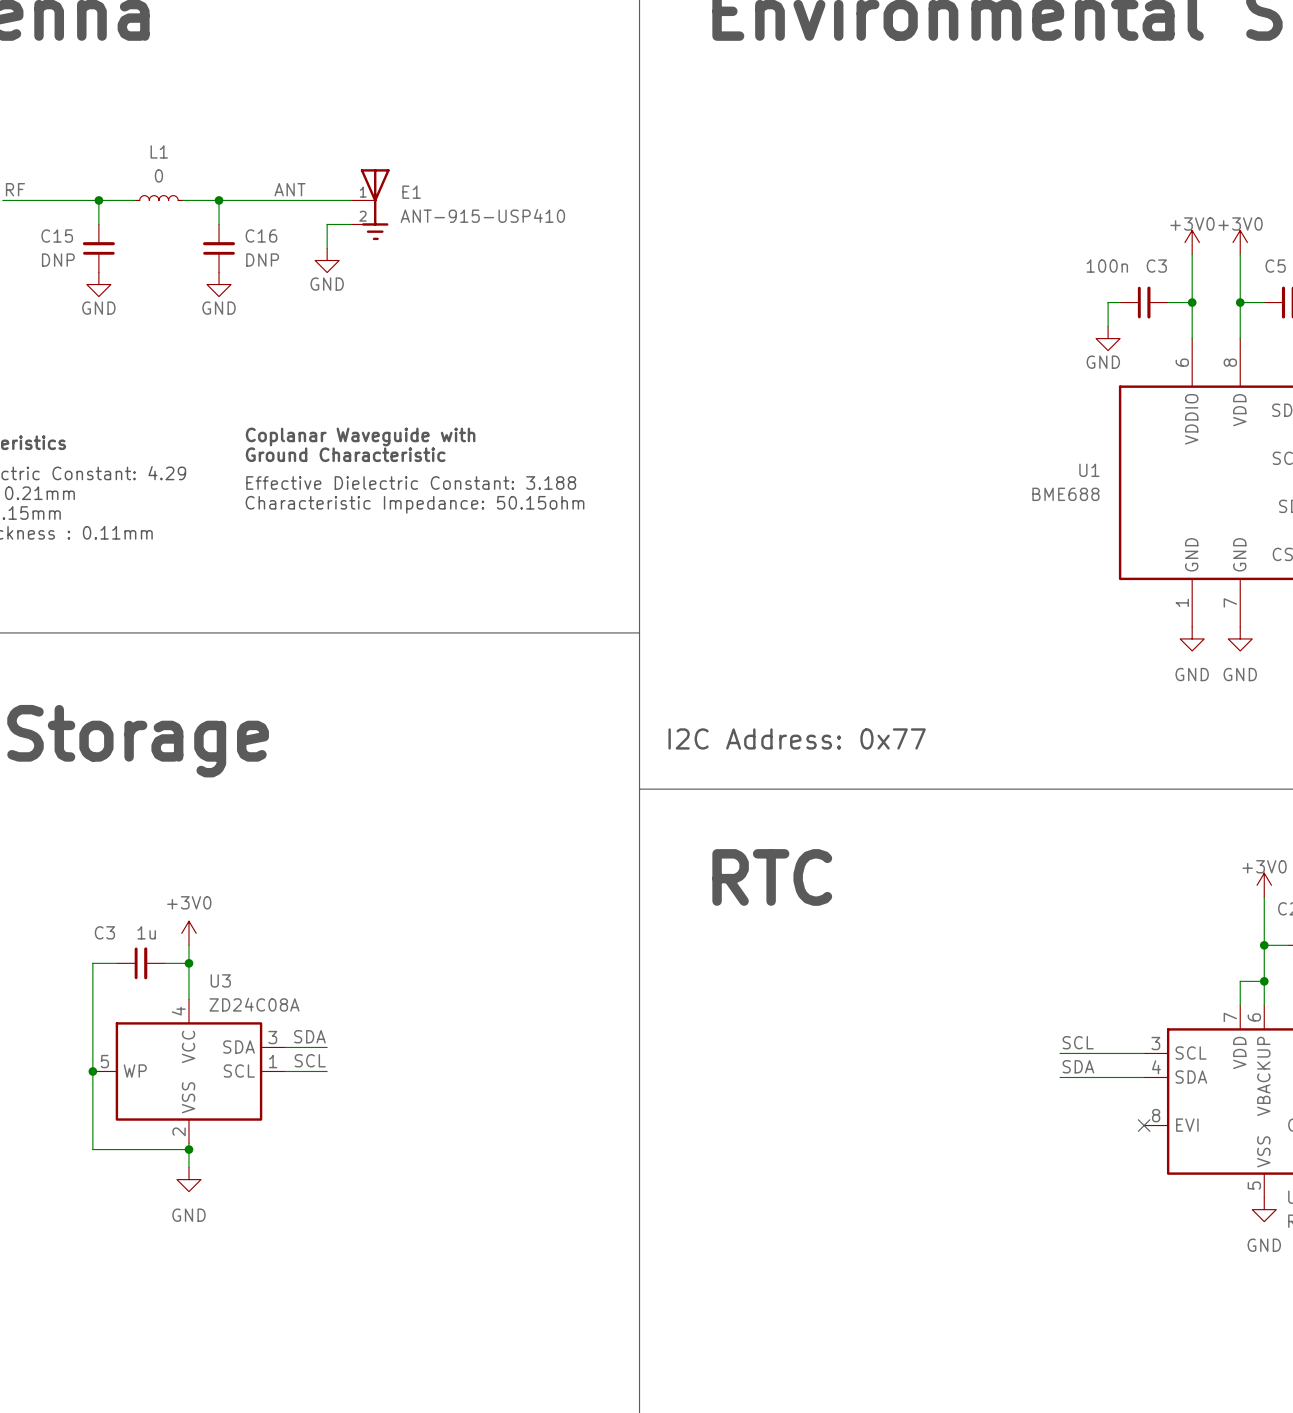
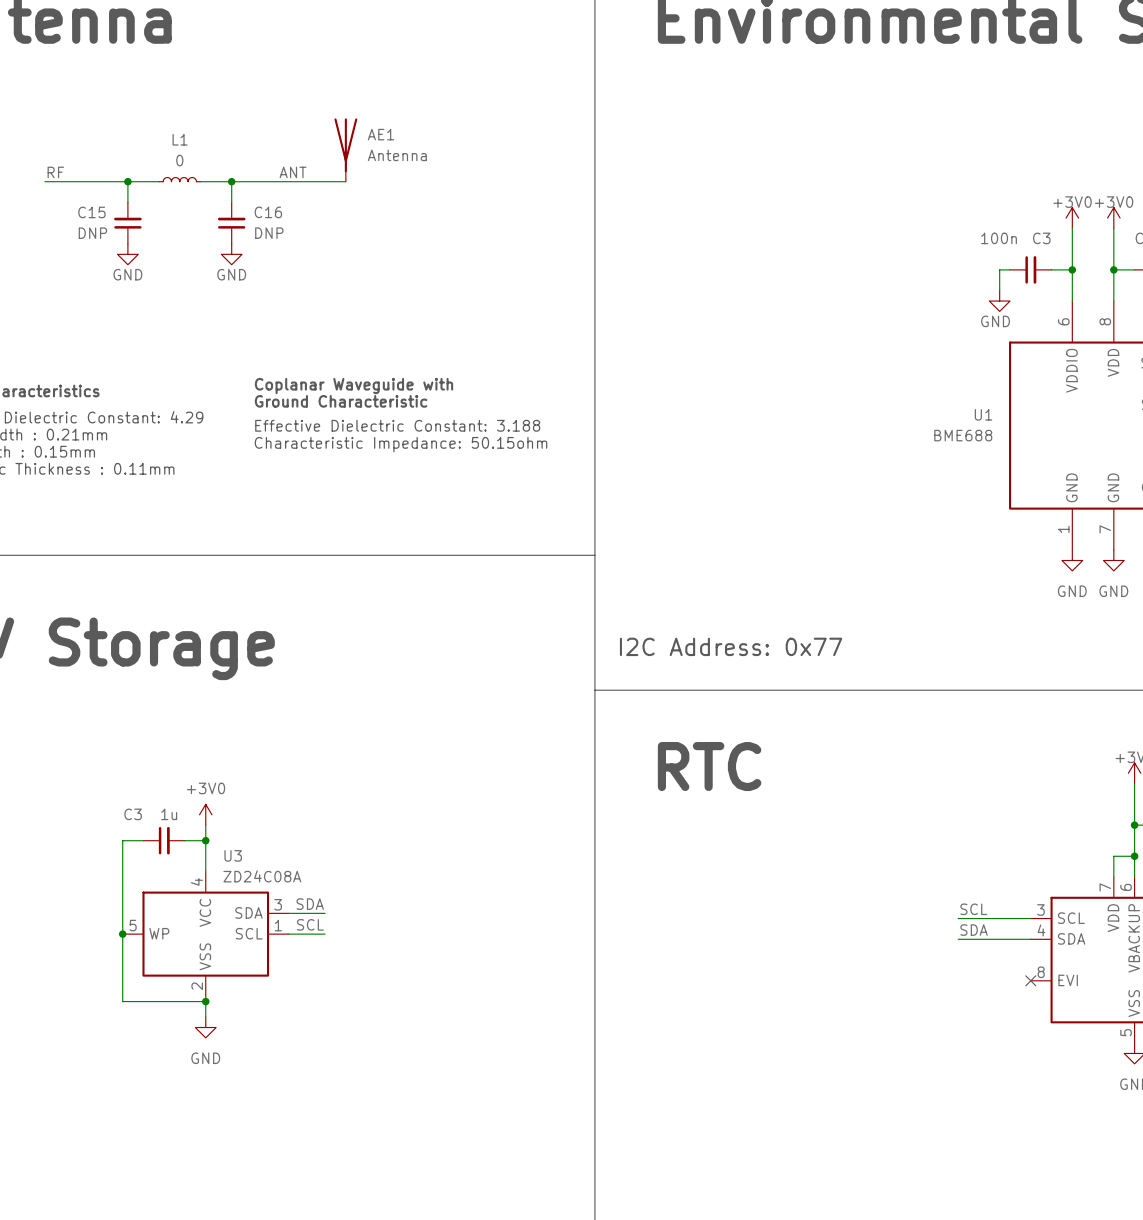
AE1: none -> Antenna (345, 150)
E1: ANT-915-USP410 (370, 204) -> none
wire: (351, 224) (327, 224) (327, 248) -> none
power symbol: GND (327, 260) -> none

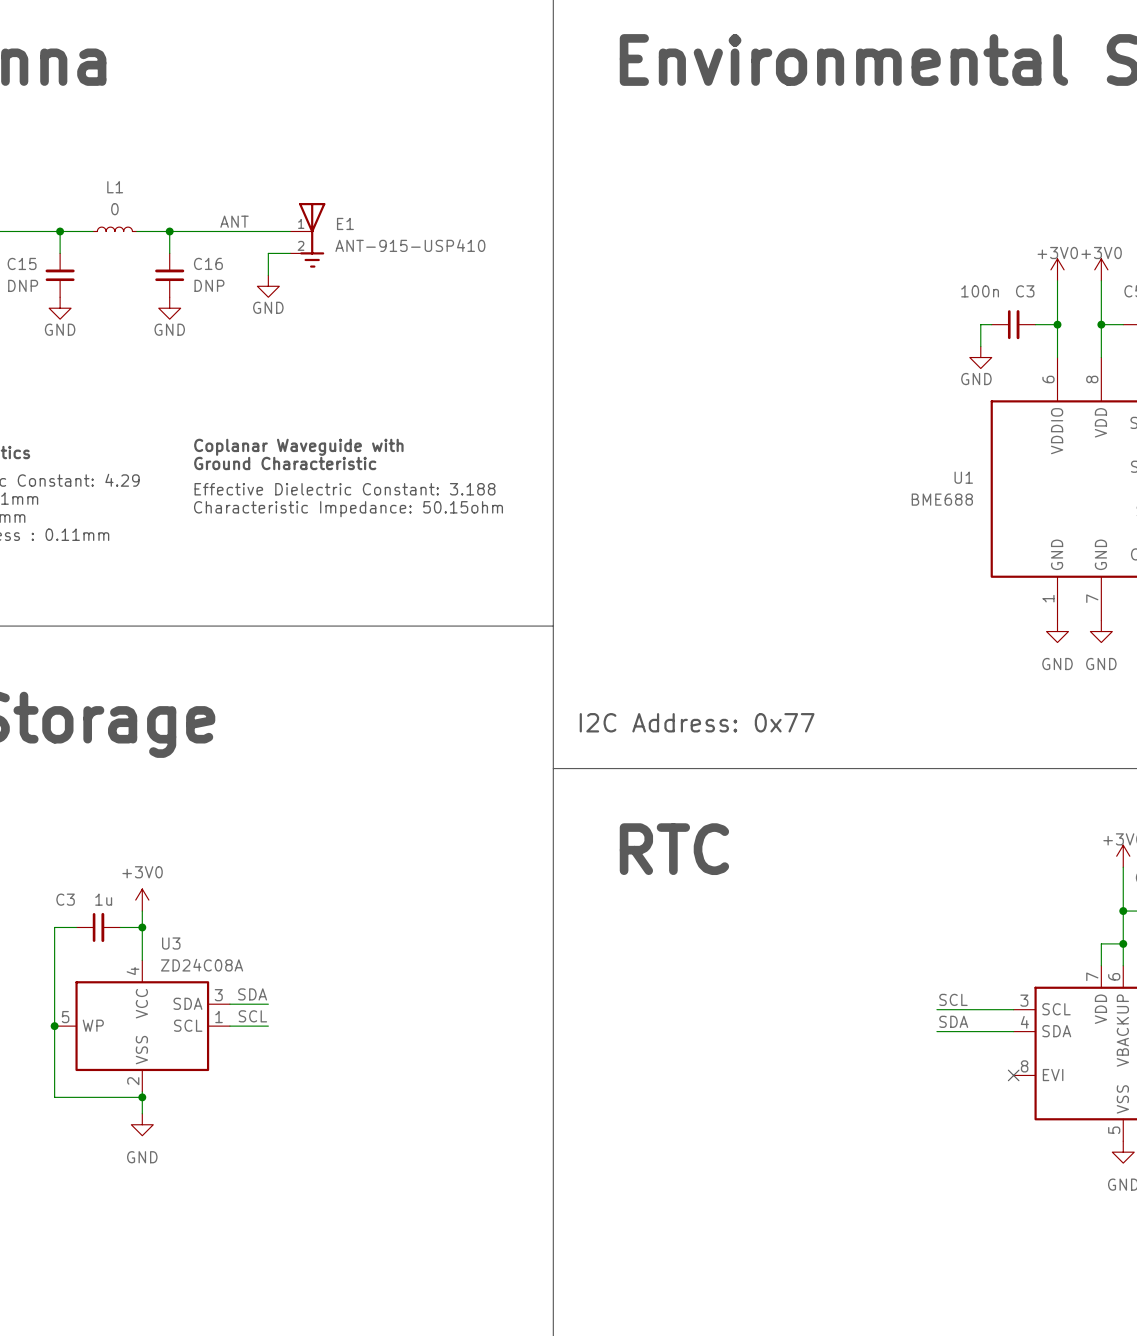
AE1: Antenna (345, 150) -> none
E1: none -> ANT-915-USP410 (307, 235)
wire: none -> (290, 253) (268, 253) (268, 275)
power symbol: none -> GND (268, 286)

